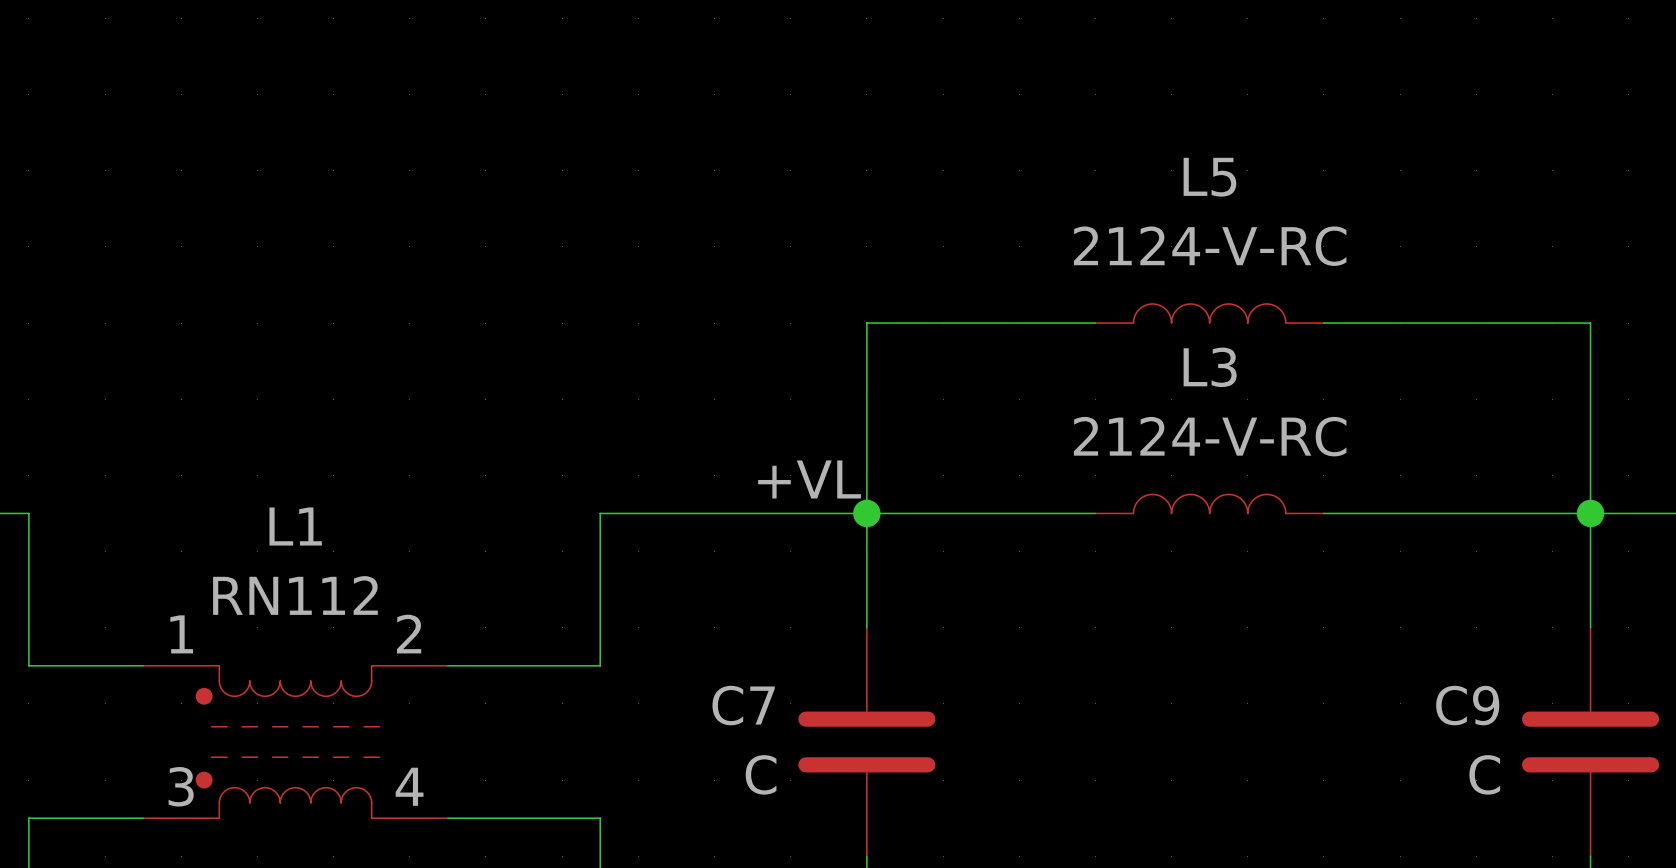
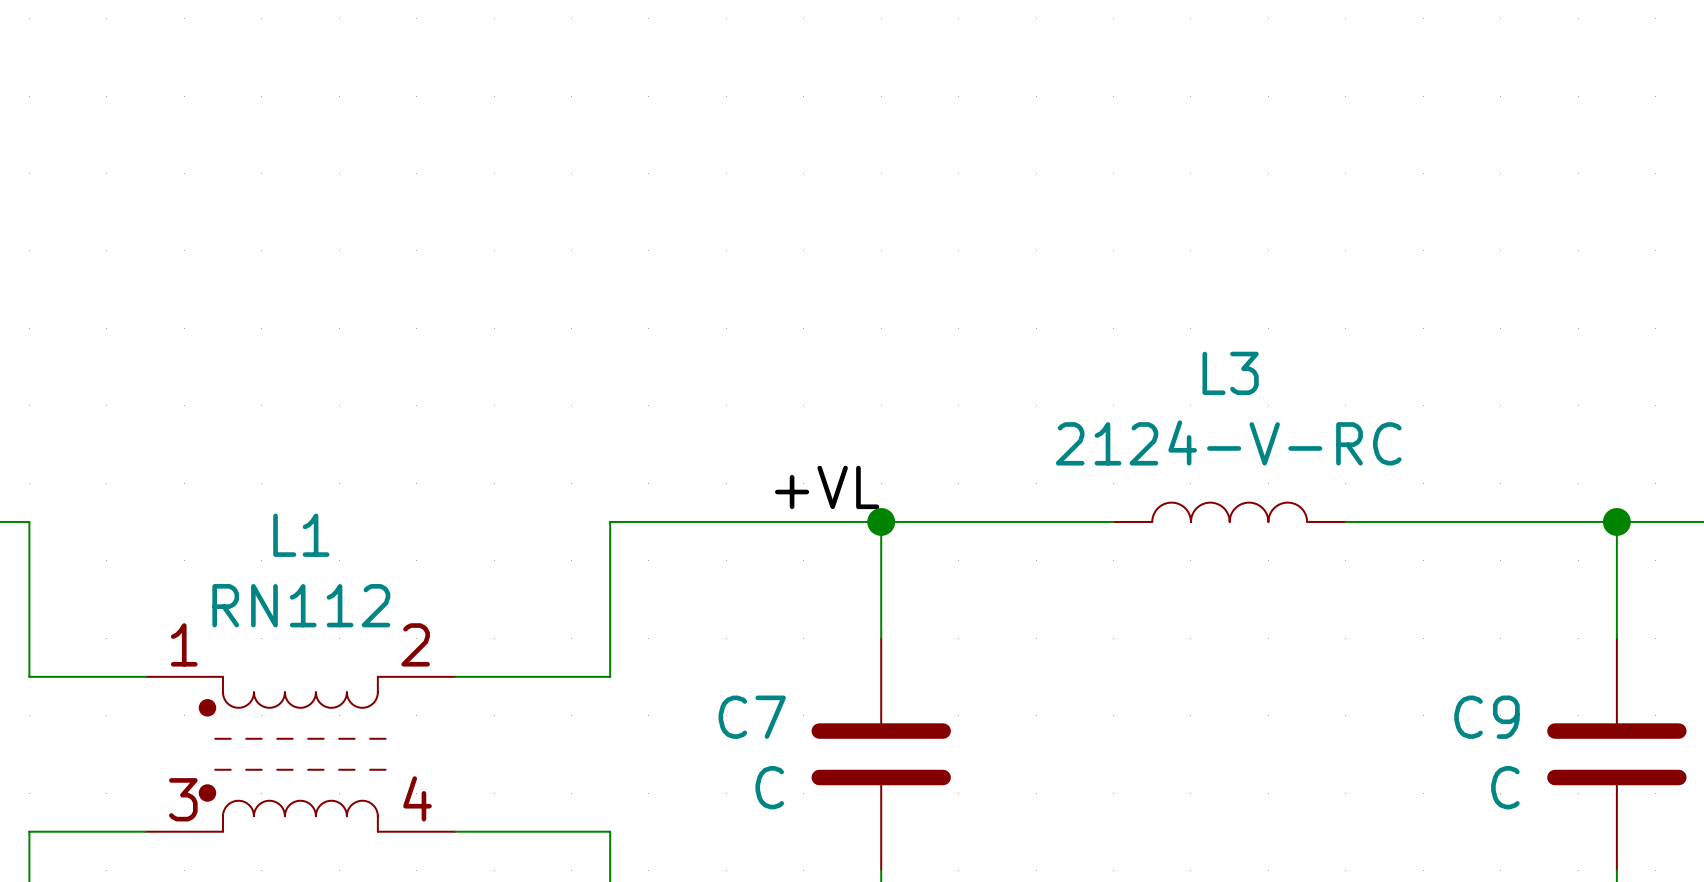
L5: 2124-V-RC (1209, 313) -> none
wire: (1095, 323) (866, 323) (866, 513) -> none
wire: (1323, 323) (1590, 323) (1590, 513) -> none

